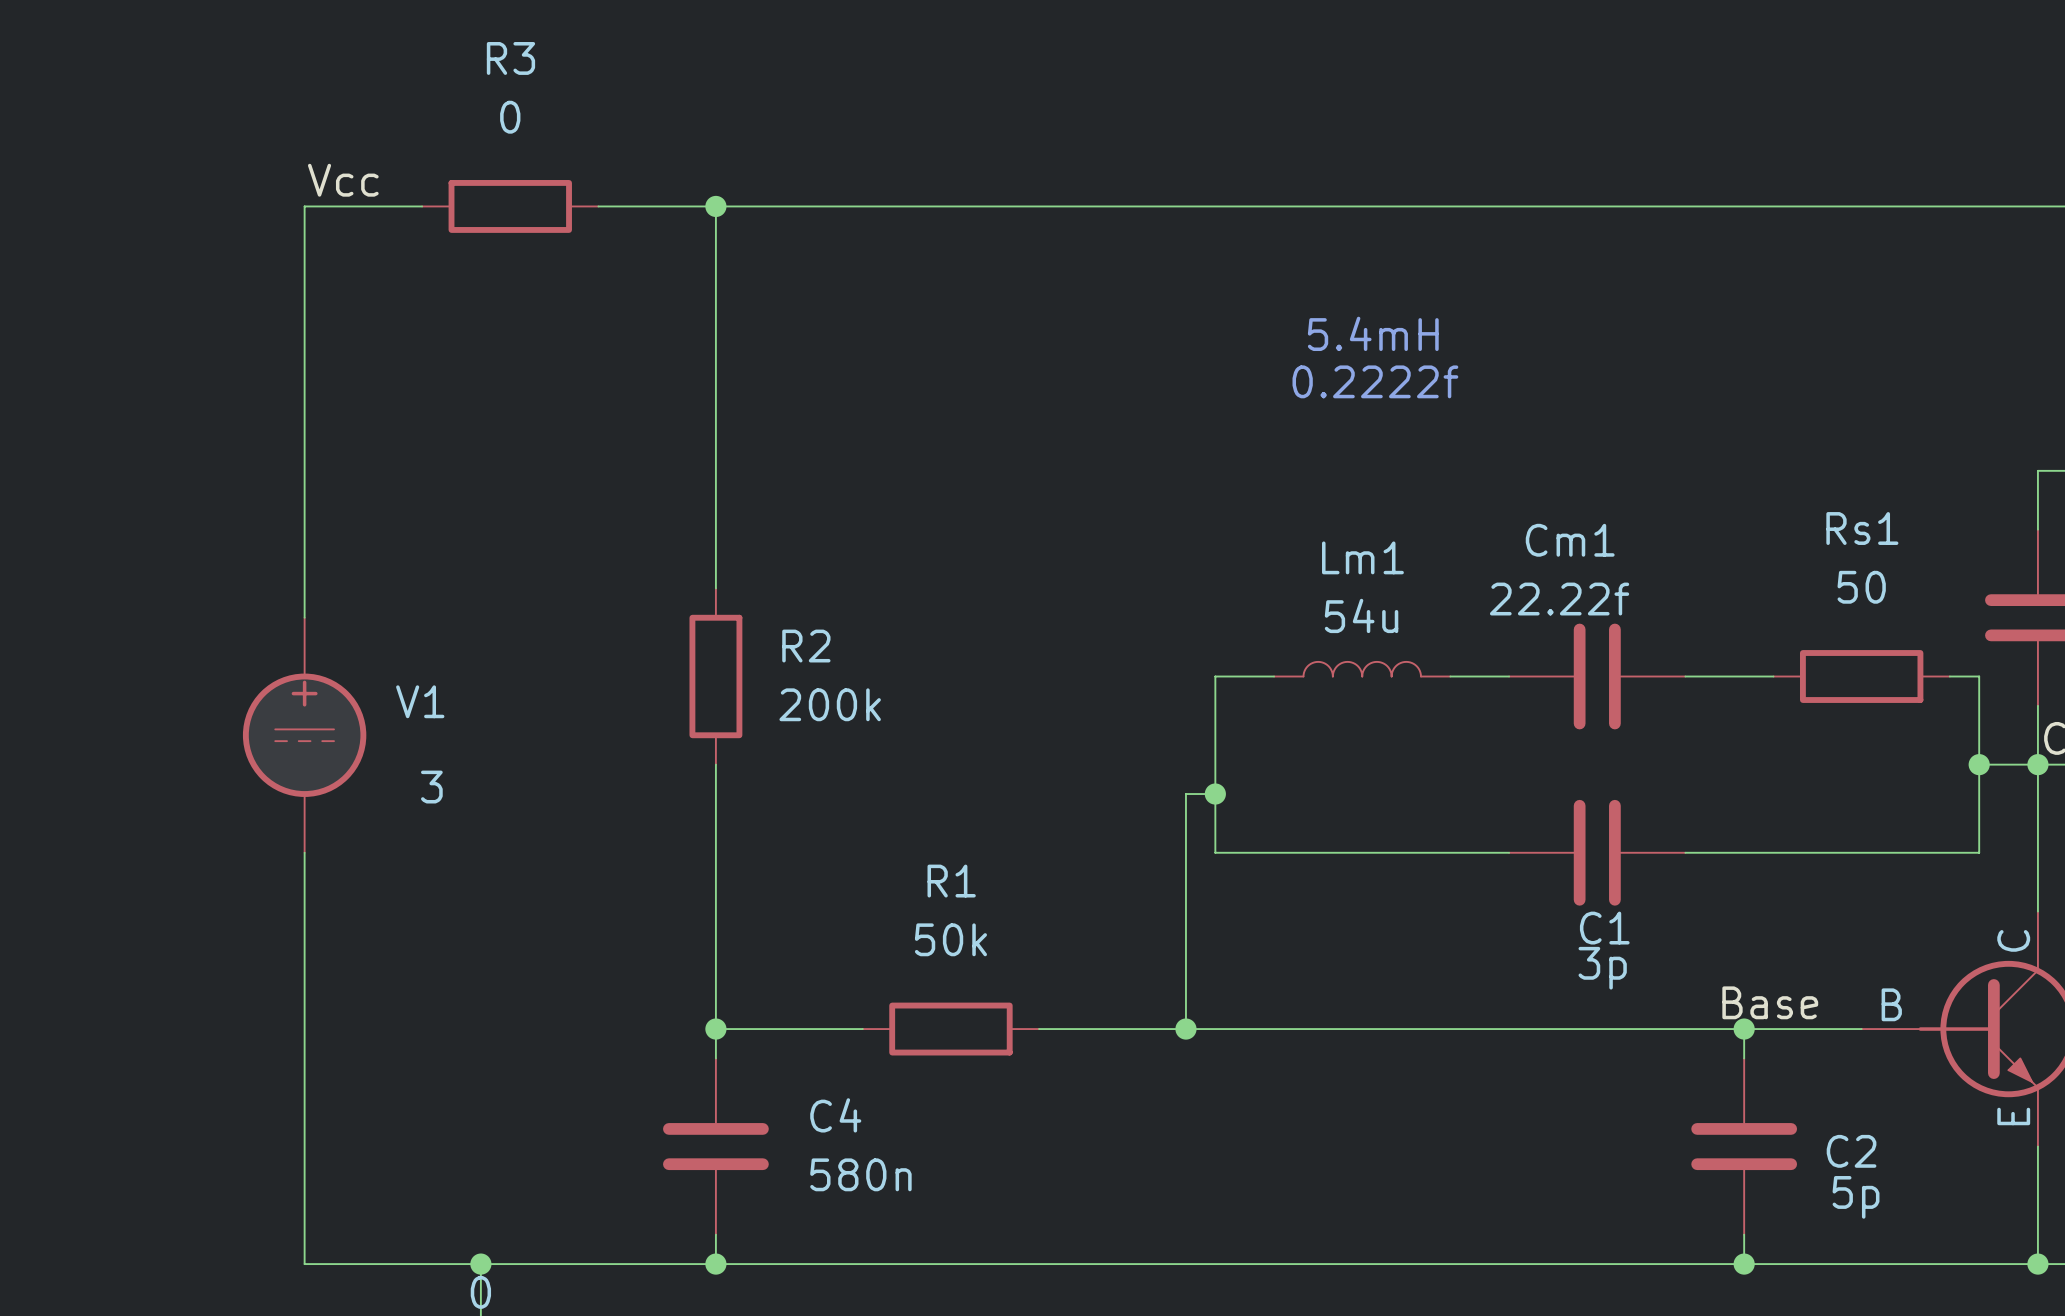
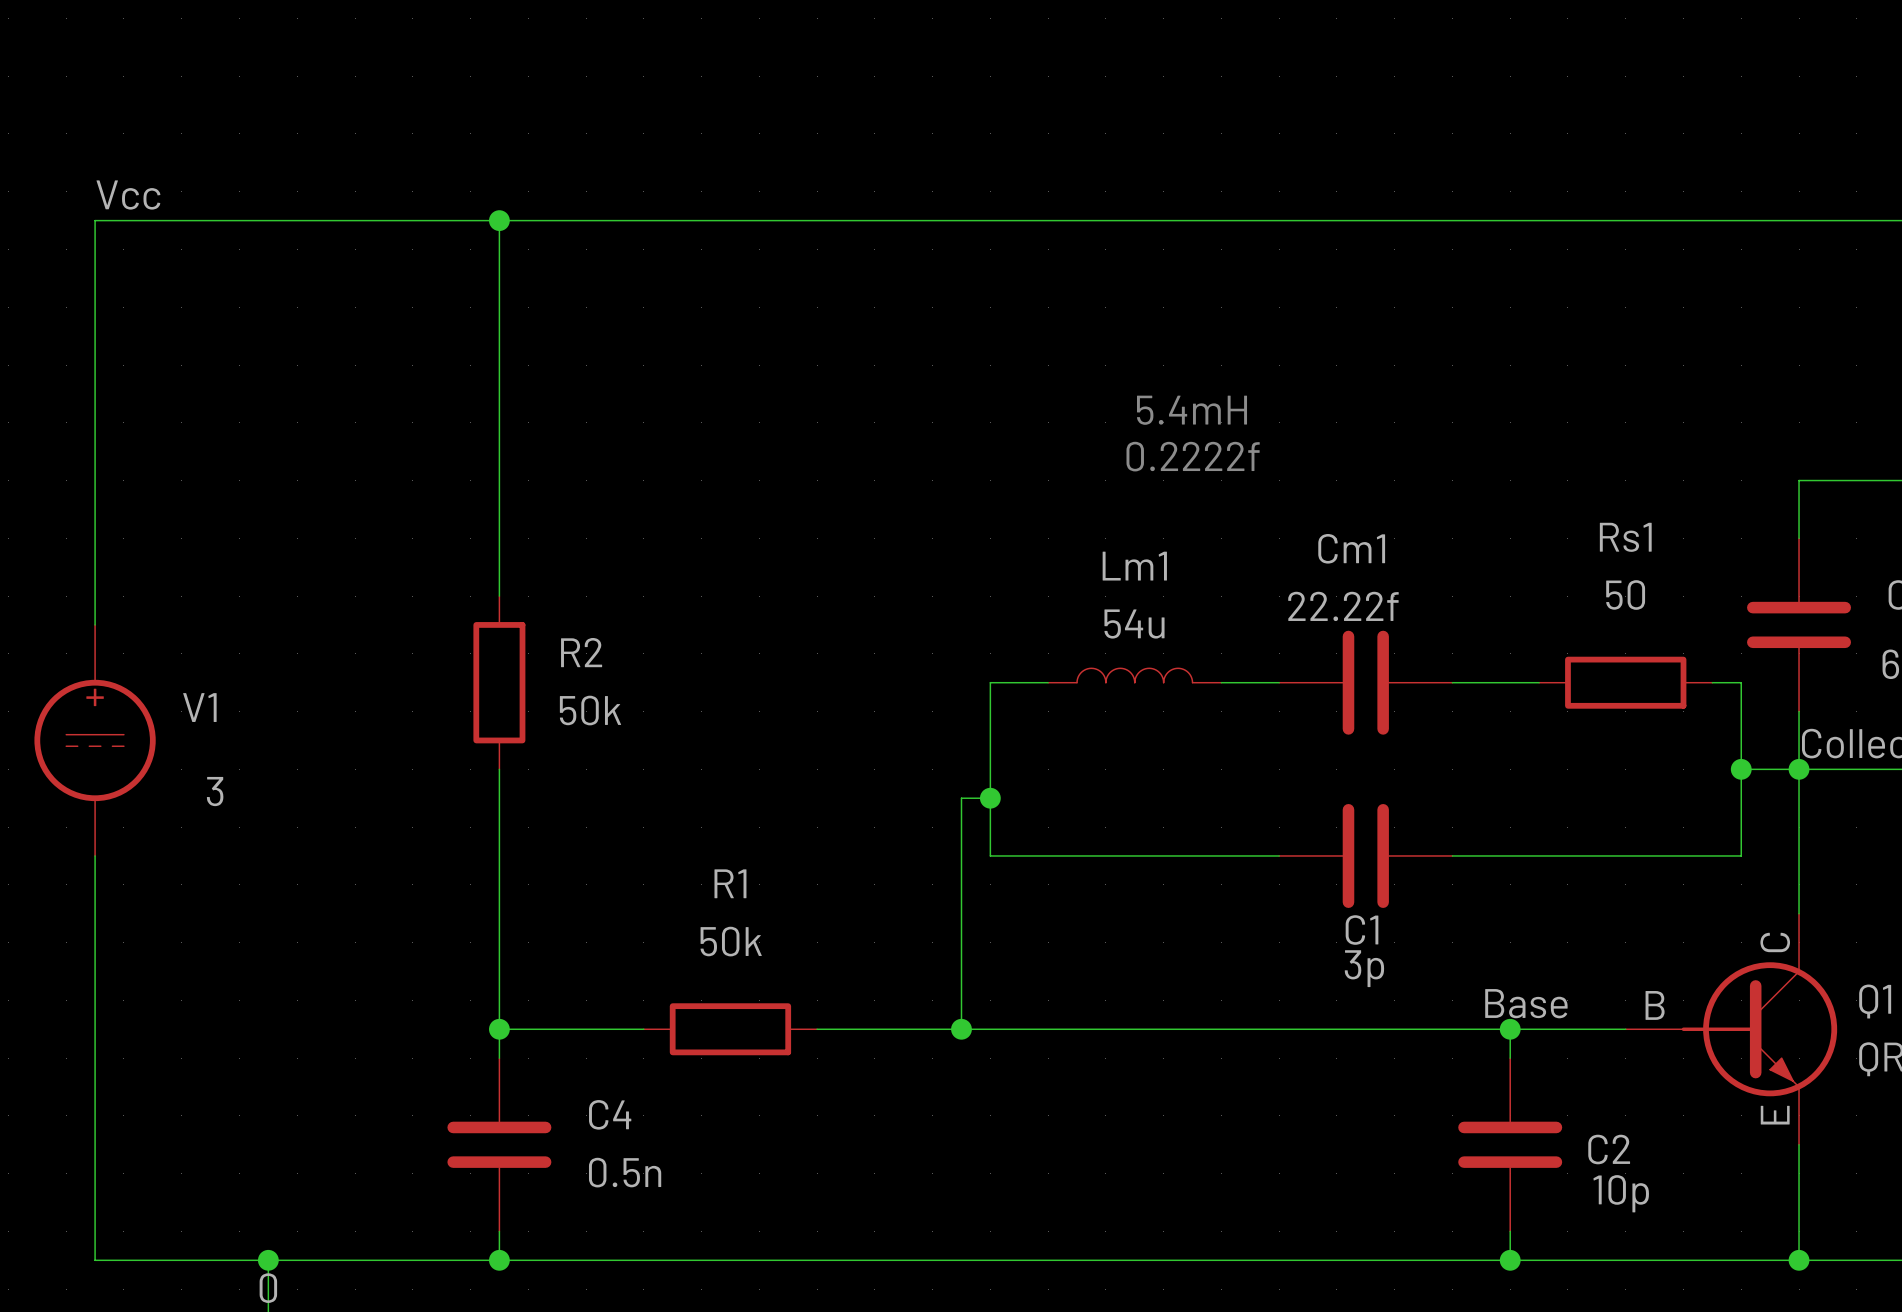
wire: none -> (210, 220) (383, 220)
R3: 0 (510, 206) -> none
text position: 5.4mH (1373, 333) -> 5.4mH (1192, 410)
text position: 0.2222f (1375, 381) -> 0.2222f (1193, 456)
R2 value: 200k (830, 704) -> 50k (590, 710)
C4 value: 580n (860, 1174) -> 0.5n (625, 1172)
C2 value: 5p (1856, 1197) -> 10p (1621, 1193)

